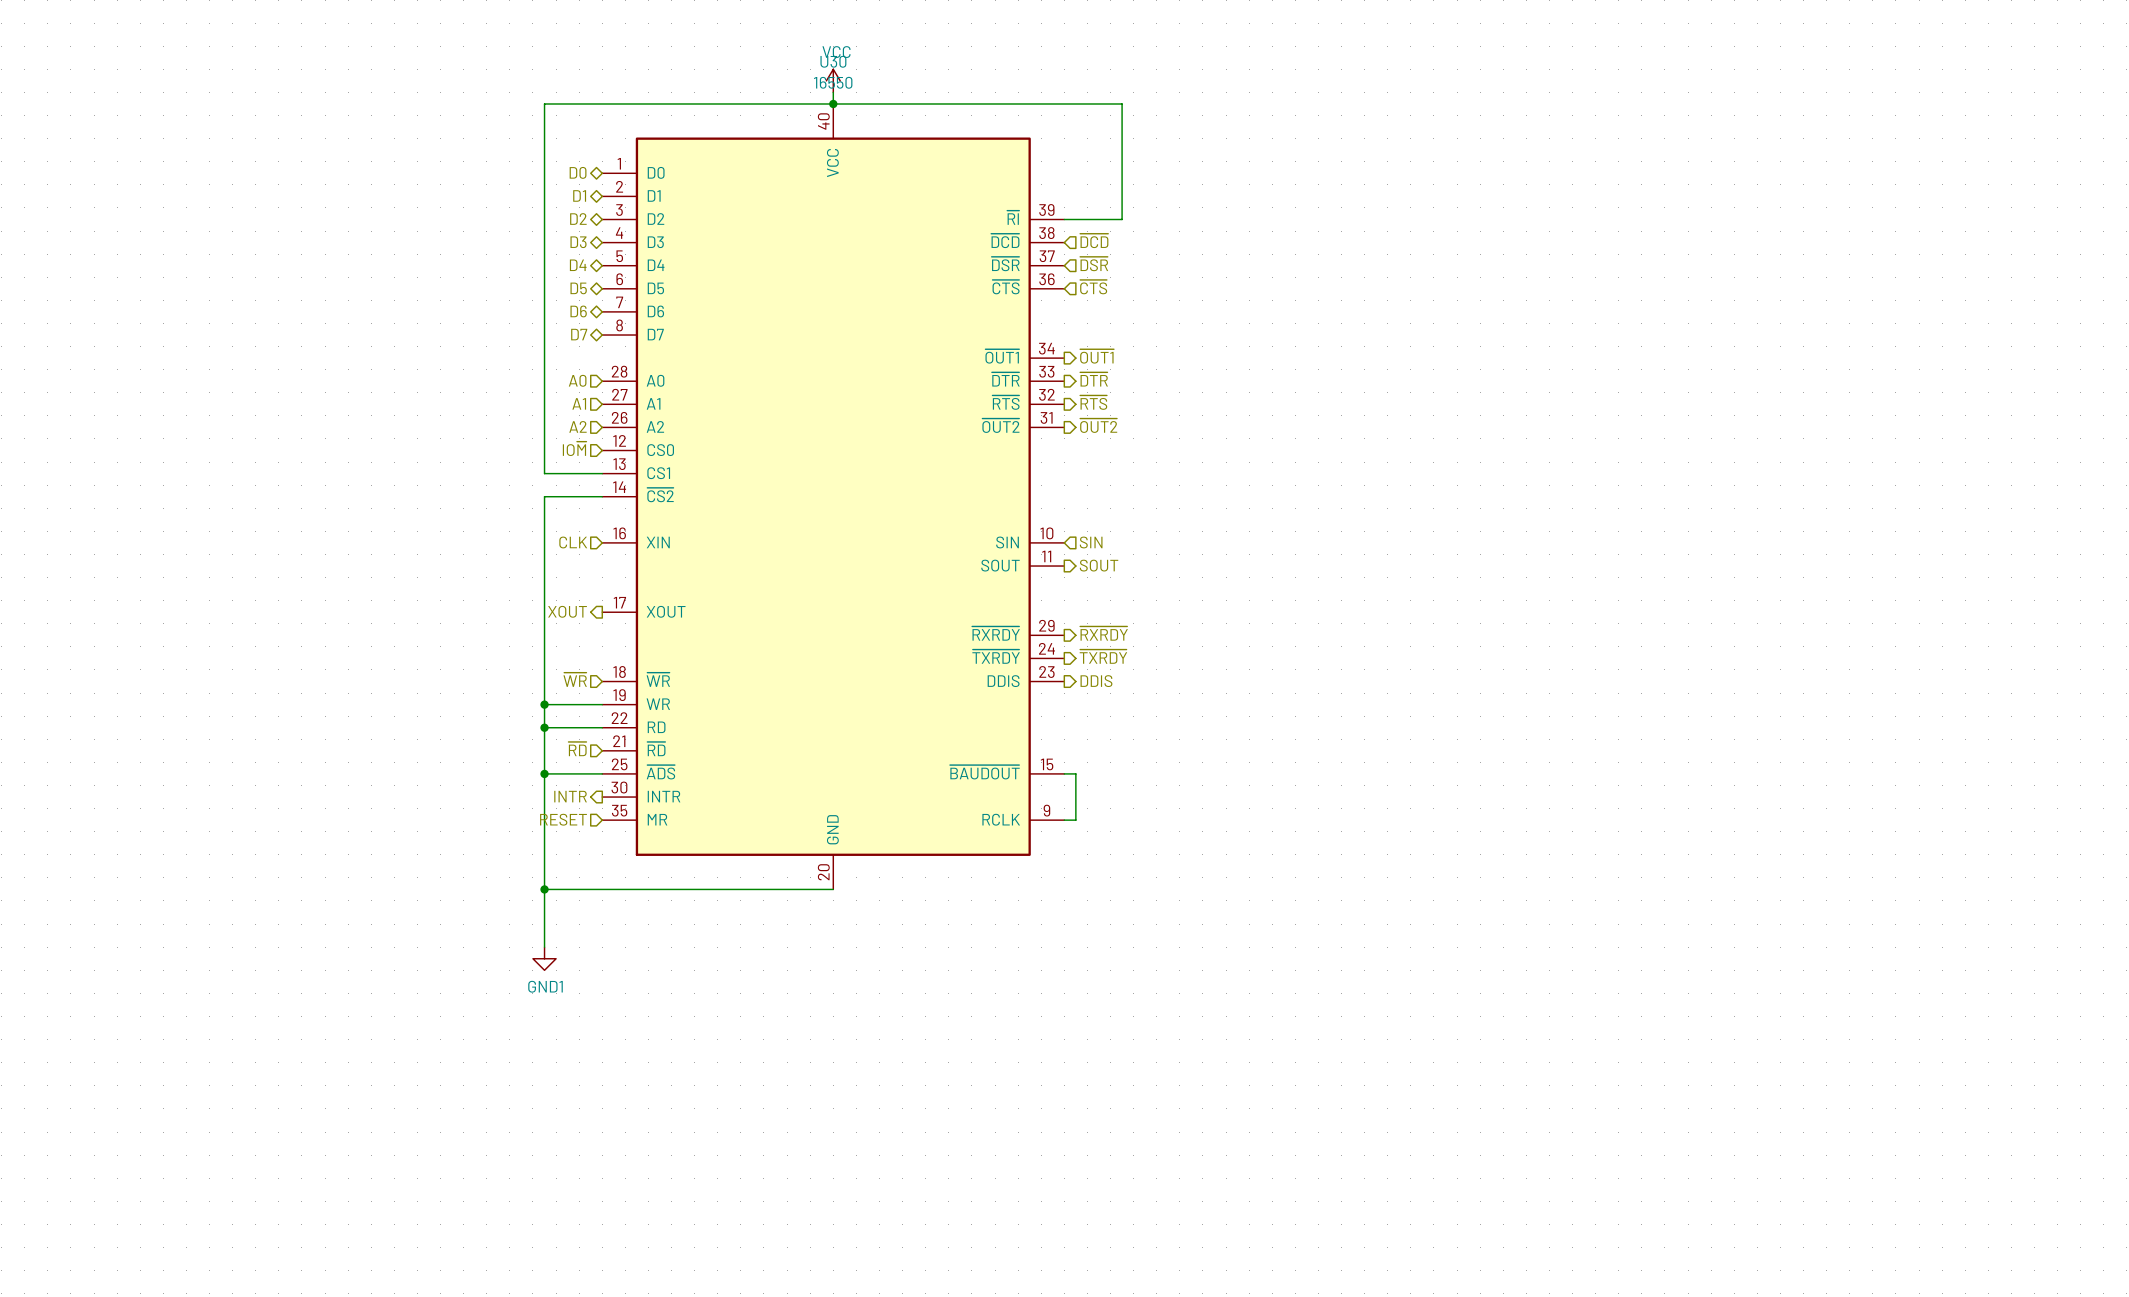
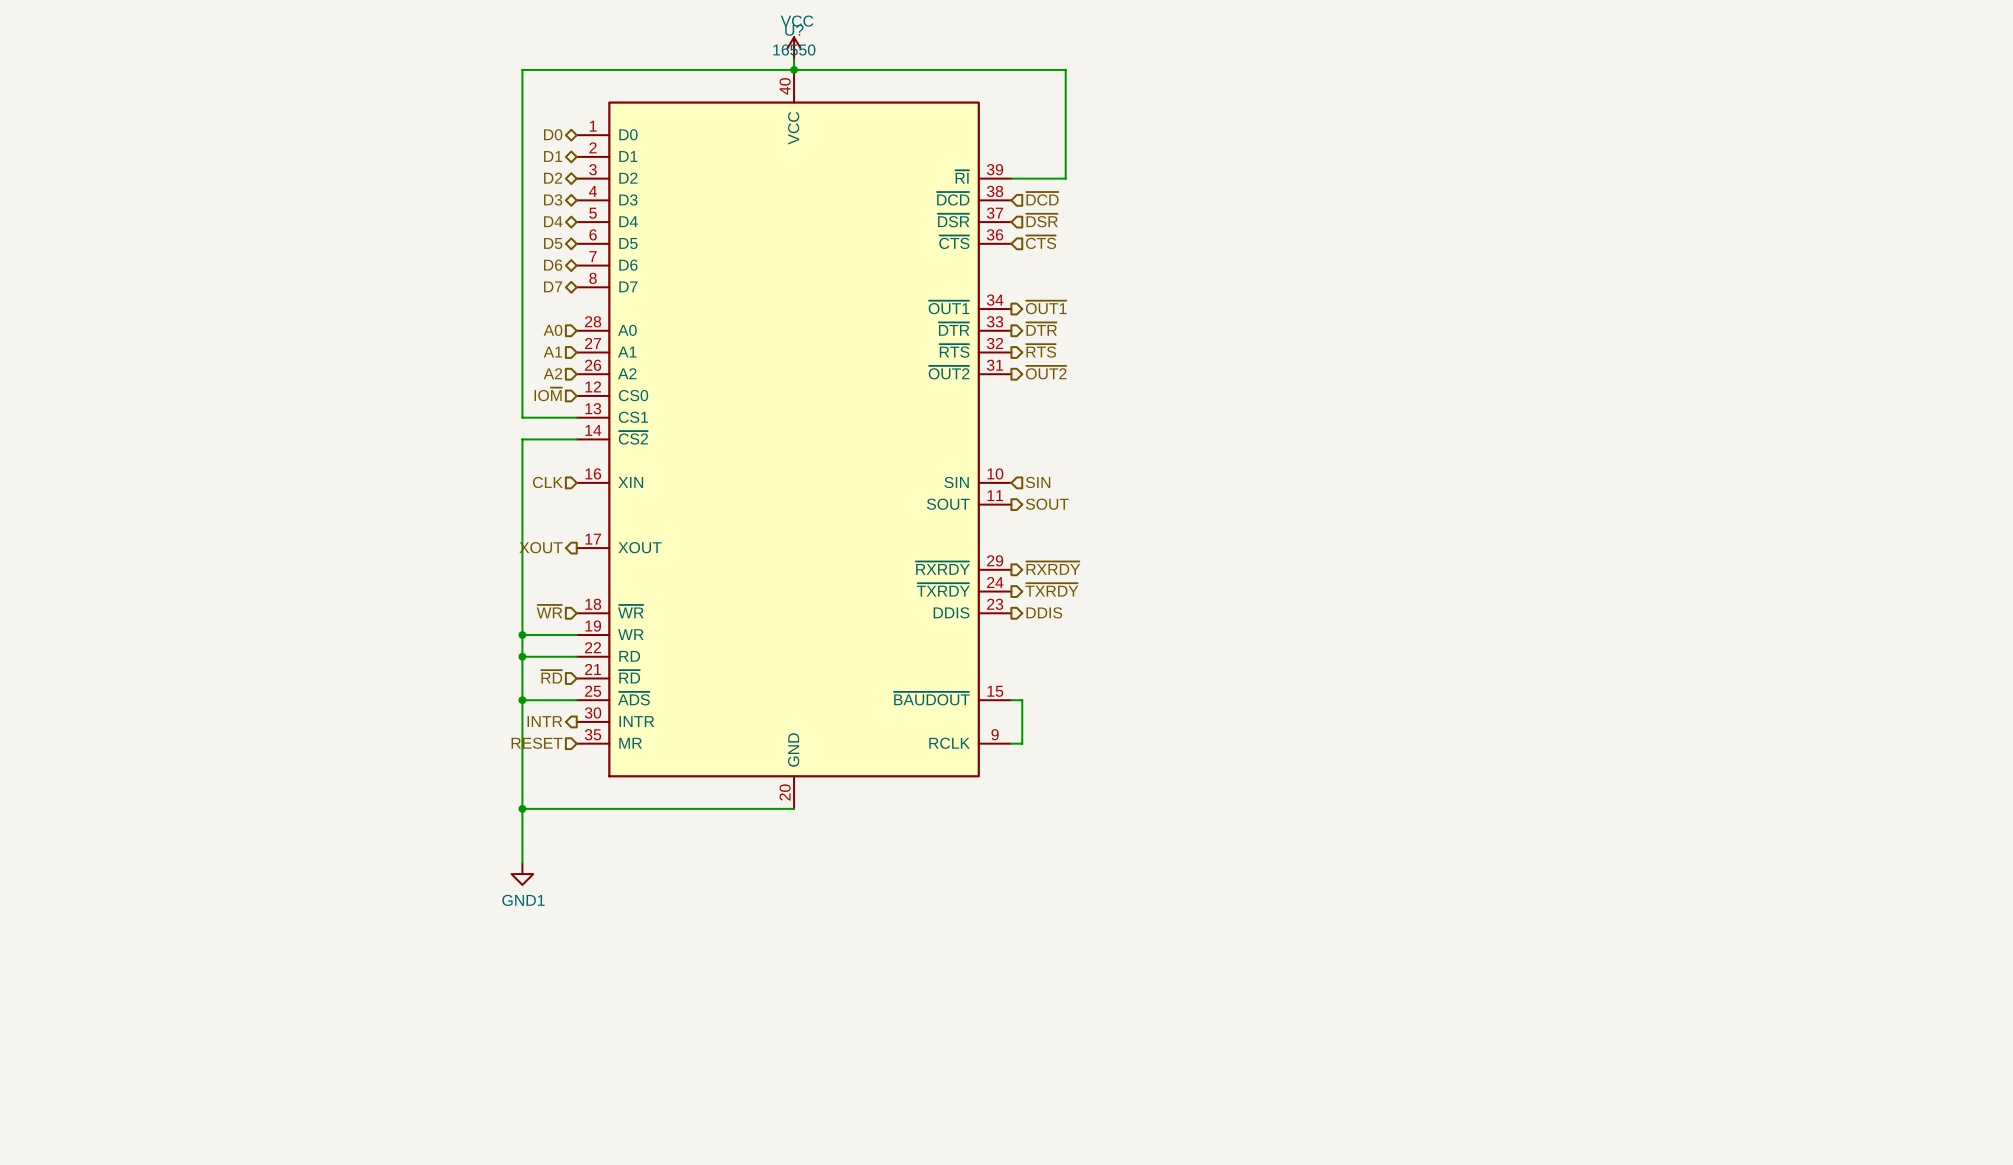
U30 name: U30 (833, 61) -> U? (794, 30)

